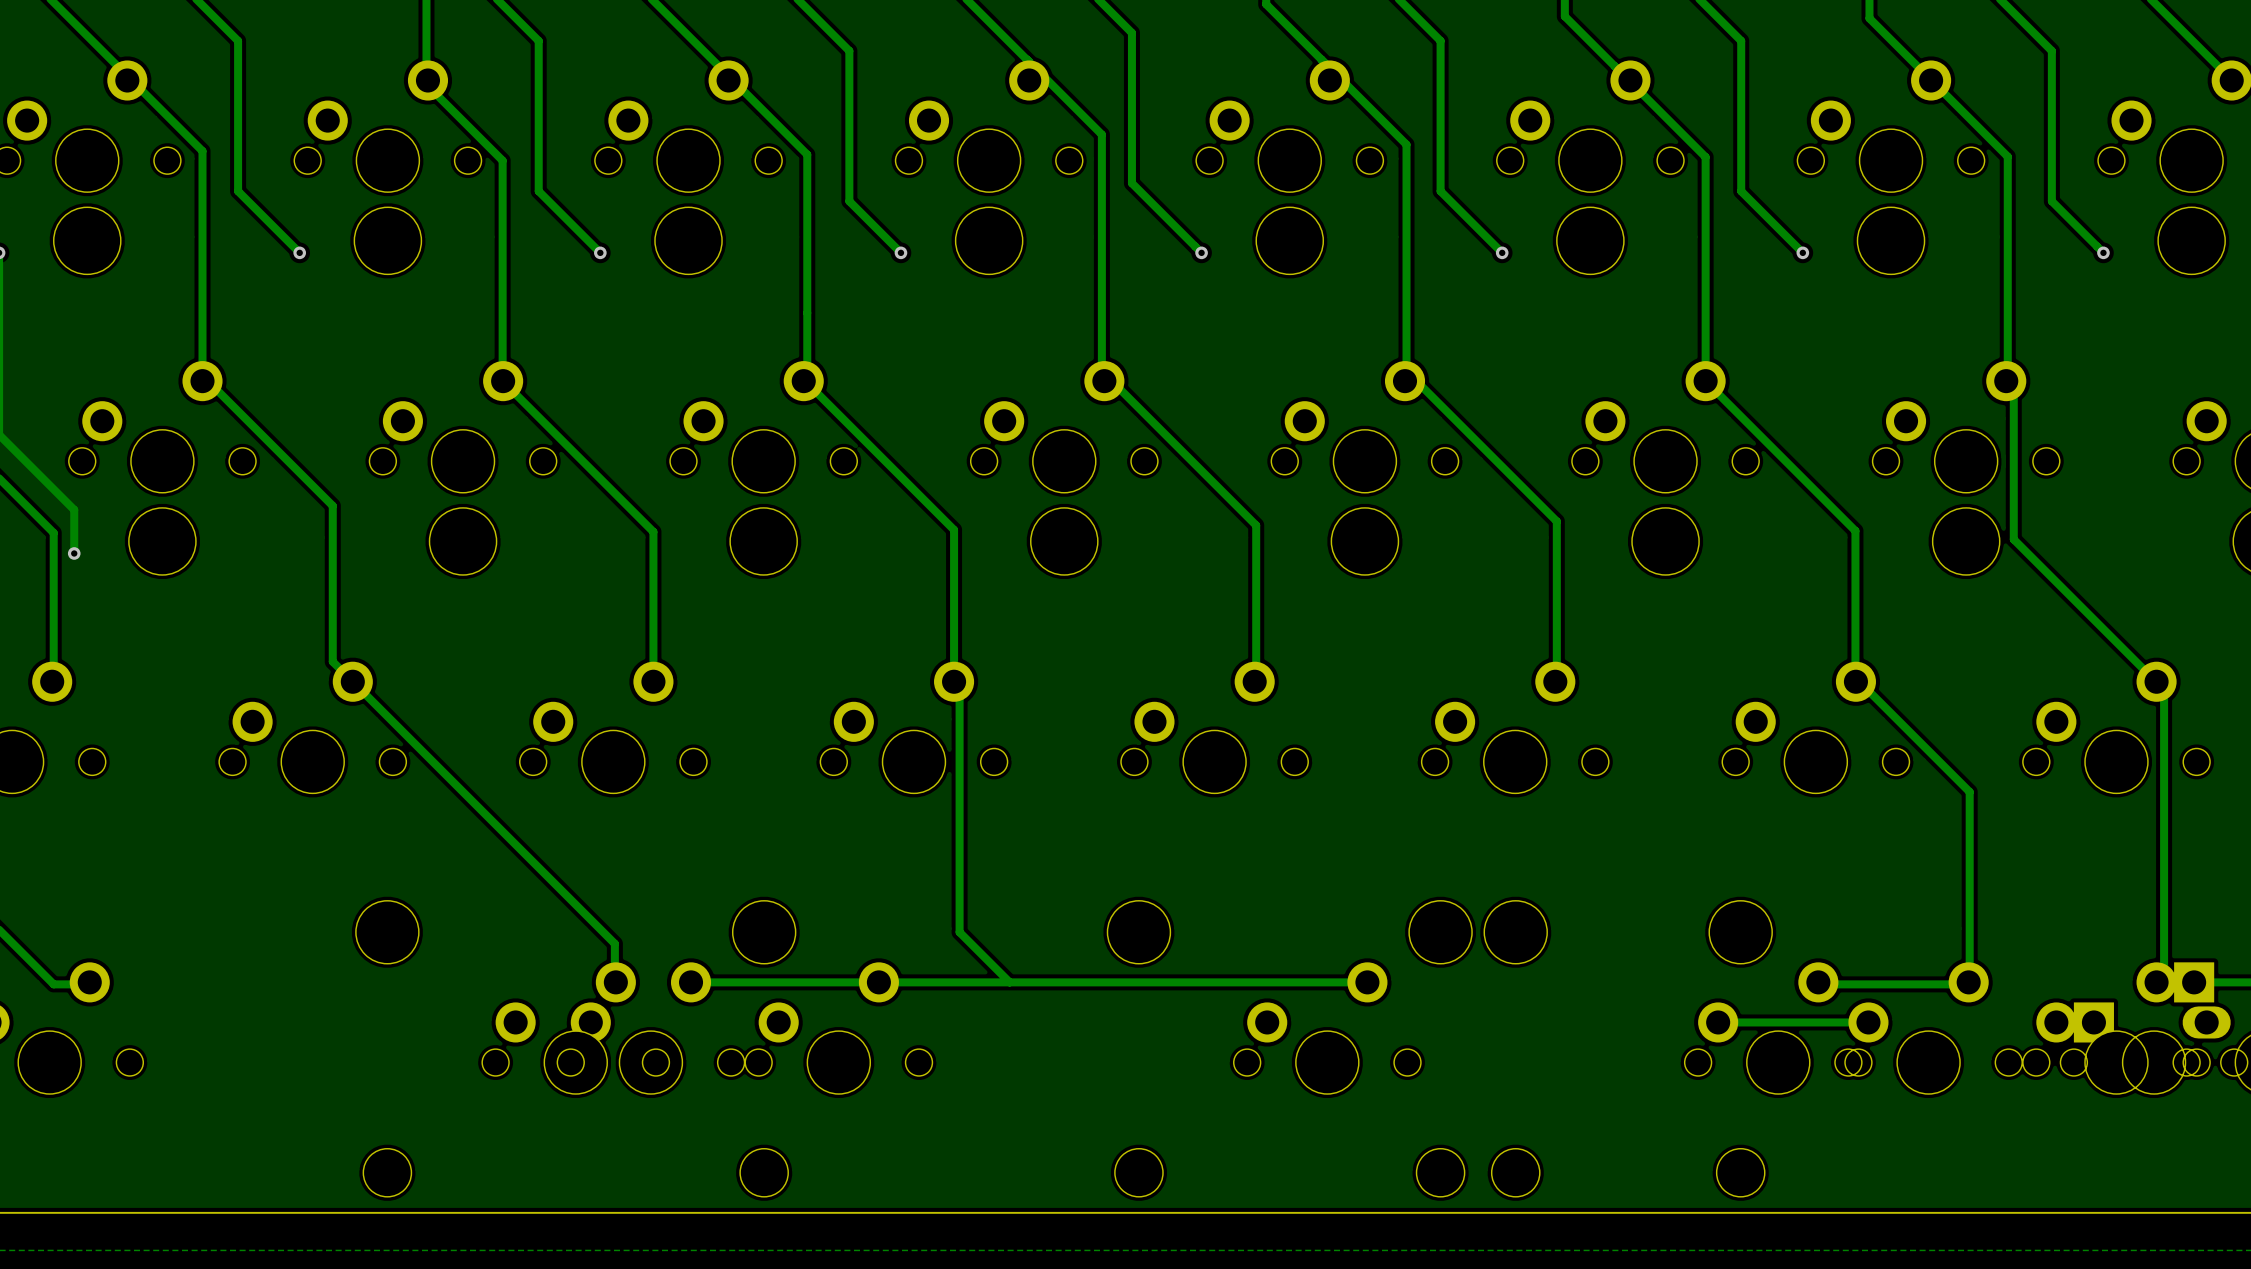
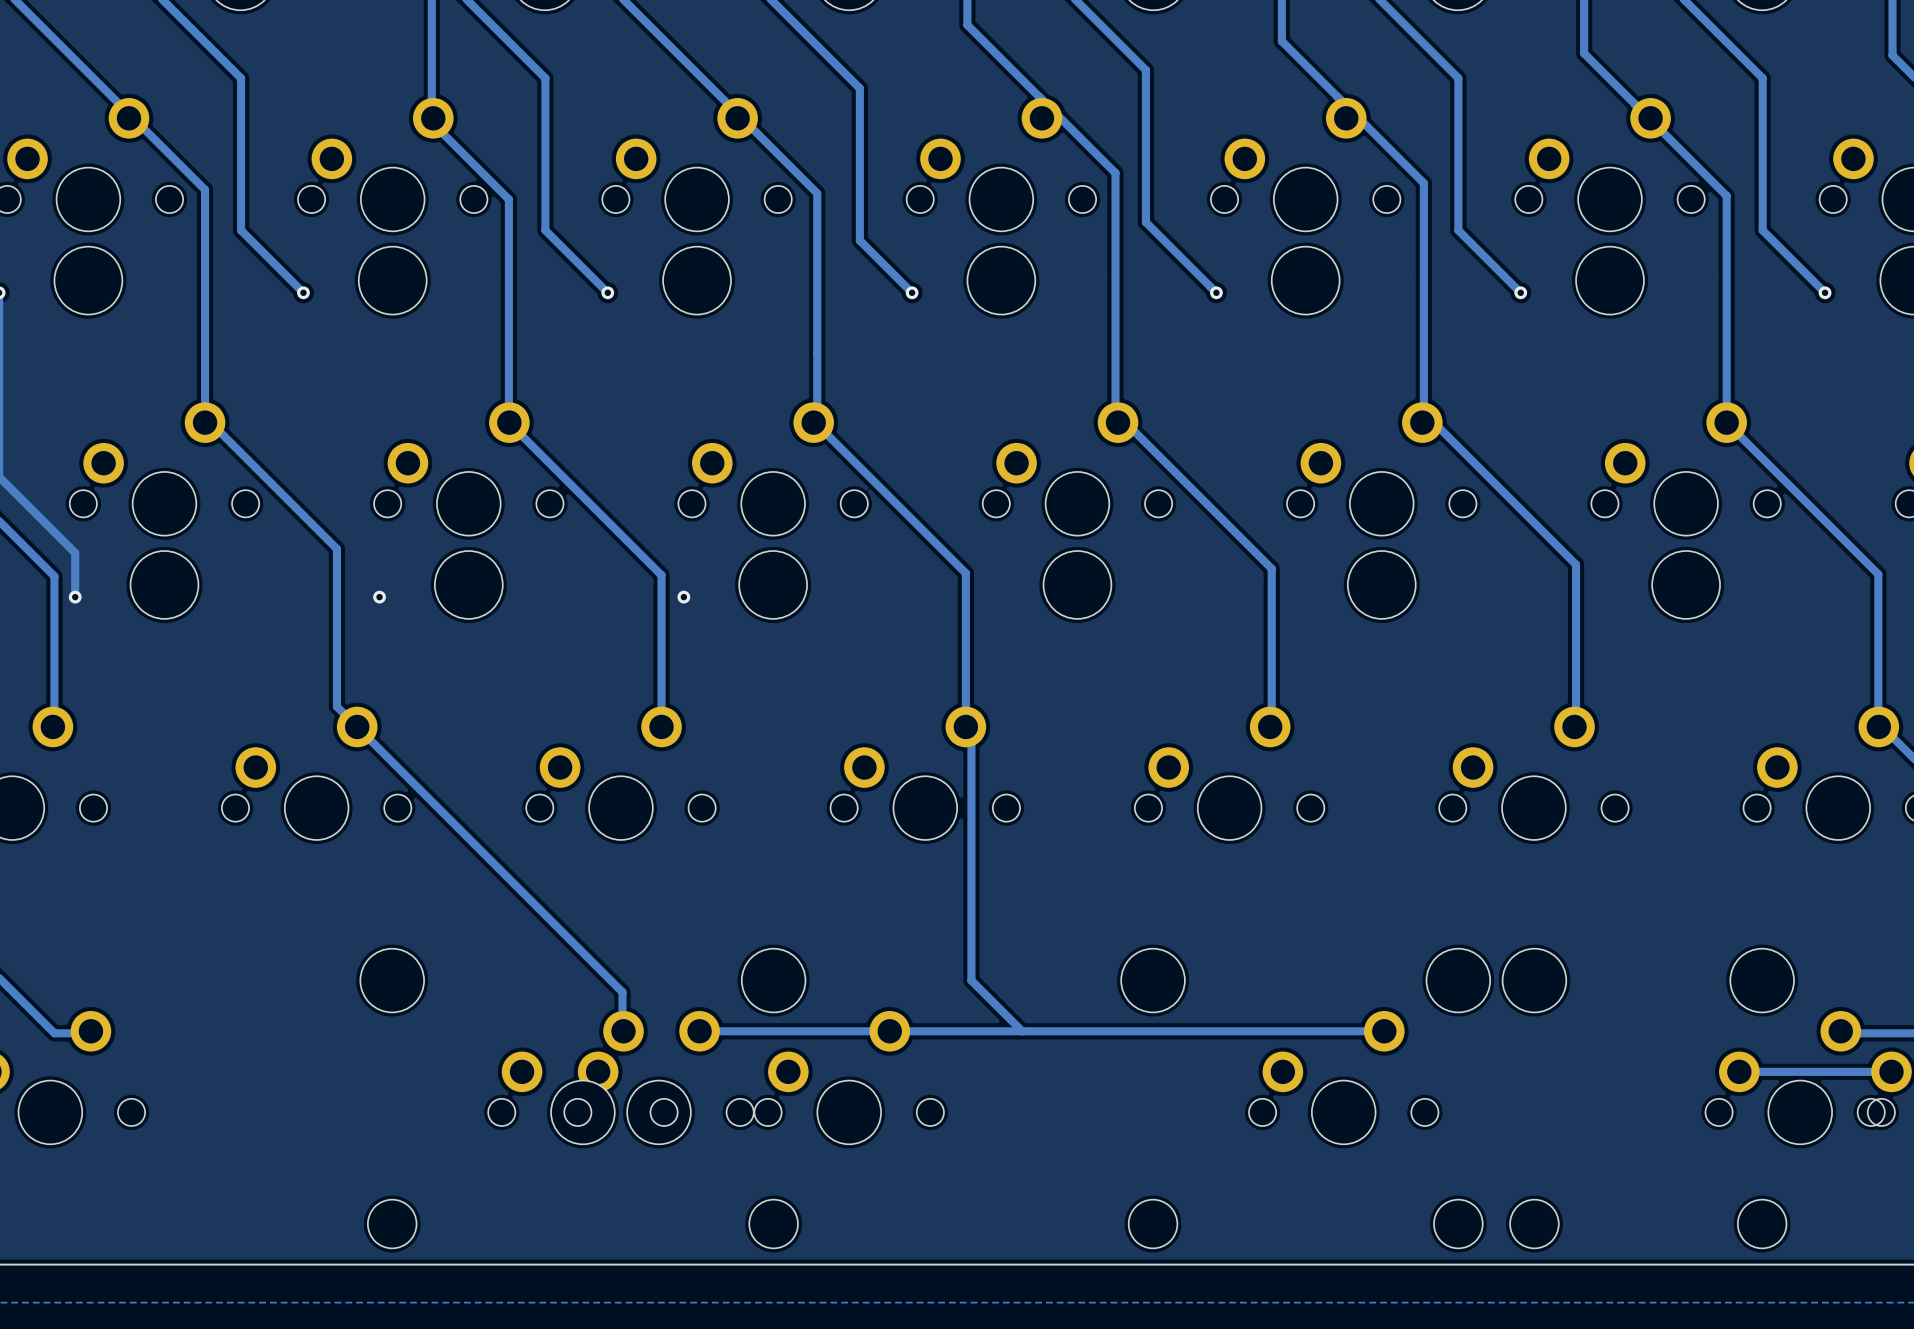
via: none -> (379, 597)
via: none -> (683, 597)

